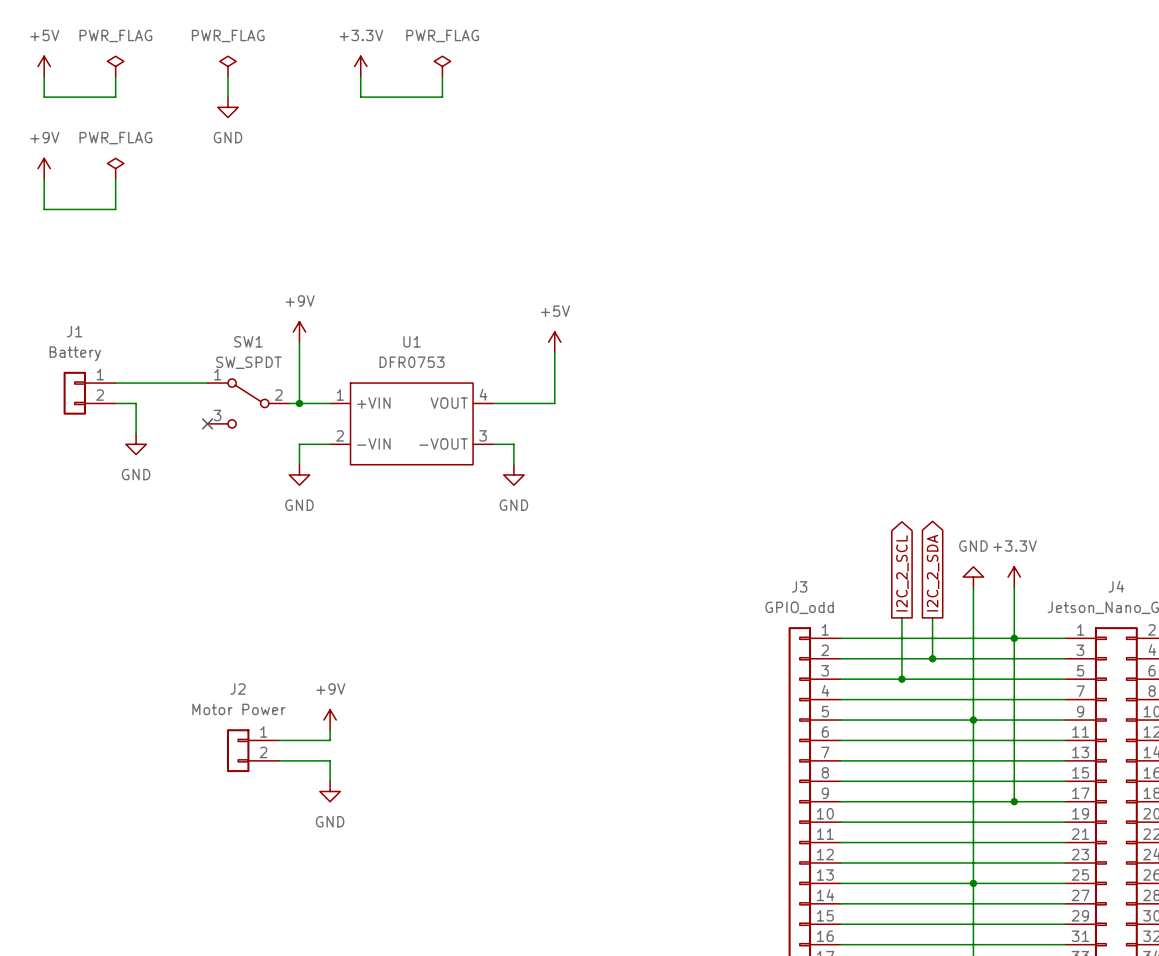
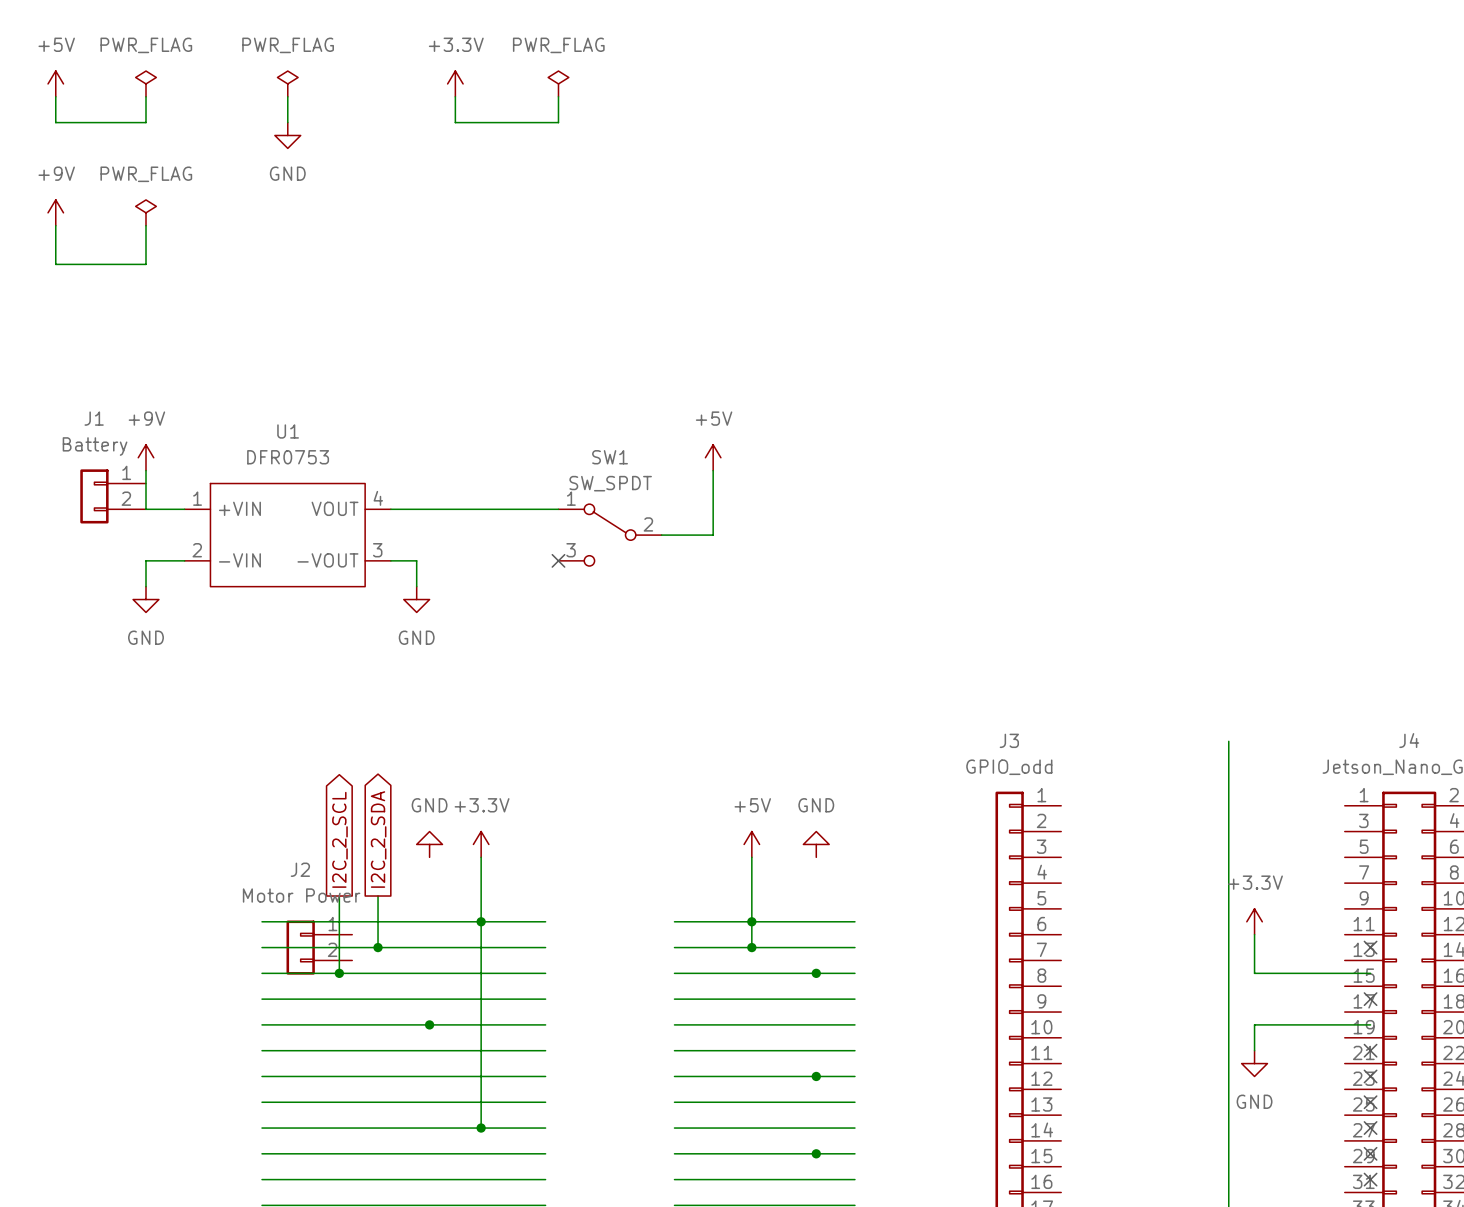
power symbol position: +9V (299, 331) -> +9V (146, 457)
wire: (299, 342) (299, 403) -> none
power symbol position: +5V (554, 342) -> +5V (713, 457)
wire: (554, 352) (554, 403) (493, 403) -> none
wire: none -> (146, 470) (146, 509)
wire: none -> (713, 470) (713, 535) (661, 535)
wire: (115, 383) (207, 383) -> none
wire: (136, 403) (136, 434) -> (171, 509) (184, 509)
SW1 position: (248, 403) -> (610, 535)
junction: (299, 403) -> none
wire: none -> (416, 509) (558, 509)
no-connect mark: (207, 423) -> none
U1 position: (411, 423) -> (287, 535)
power symbol position: GND (136, 444) -> GND (146, 599)
wire: none -> (184, 560) (146, 560) (146, 586)
wire: (309, 444) (299, 444) (299, 464) -> none
wire: none -> (416, 560) (416, 586)
no-connect mark: none -> (558, 560)
wire: (493, 444) (513, 444) (513, 464) -> none
power symbol position: GND (299, 474) -> GND (416, 599)
power symbol: GND (513, 474) -> none
global label: I2C_2_SCL (902, 573) -> none
global label: I2C_2_SDA (933, 573) -> none
power symbol: GND (973, 577) -> none
power symbol position: +3.3V (1014, 577) -> +3.3V (1254, 921)
wire: (1014, 587) (1014, 801) -> none
wire: (901, 617) (901, 679) -> none
wire: (932, 617) (932, 658) -> none
wire: (840, 638) (1065, 638) -> none
junction: (1014, 638) -> none
wire: (840, 658) (1065, 658) -> none
junction: (932, 658) -> none
global label: none -> I2C_2_SCL (339, 839)
global label: none -> I2C_2_SDA (378, 839)
power symbol: none -> GND (429, 844)
power symbol: none -> +3.3V (481, 844)
power symbol: none -> +5V (751, 844)
power symbol: none -> GND (816, 844)
wire: none -> (481, 857) (481, 1128)
wire: none -> (751, 857) (751, 947)
wire: (840, 679) (1065, 679) -> none
junction: (901, 679) -> none
wire: (840, 699) (1065, 699) -> none
wire: none -> (339, 896) (339, 973)
wire: none -> (378, 896) (378, 947)
power symbol: +9V (330, 720) -> none
wire: (840, 720) (1065, 720) -> none
junction: (973, 720) -> none
wire: none -> (262, 921) (545, 921)
wire: (330, 730) (330, 740) (279, 740) -> none
junction: none -> (481, 921)
wire: none -> (674, 921) (854, 921)
junction: none -> (751, 921)
wire: (840, 740) (1065, 740) -> none
wire: none -> (1254, 934) (1254, 973) (1370, 973)
wire: none -> (262, 947) (545, 947)
junction: none -> (378, 947)
wire: none -> (674, 947) (854, 947)
junction: none -> (751, 947)
no-connect mark: none -> (1370, 947)
wire: (279, 760) (330, 760) (330, 781) -> none
wire: (840, 760) (1065, 760) -> none
wire: none -> (262, 973) (545, 973)
junction: none -> (339, 973)
wire: none -> (674, 973) (854, 973)
junction: none -> (816, 973)
wire: (840, 781) (1065, 781) -> none
wire: none -> (262, 999) (545, 999)
power symbol: GND (330, 791) -> none
wire: none -> (674, 999) (854, 999)
no-connect mark: none -> (1370, 999)
wire: (840, 801) (1065, 801) -> none
junction: (1014, 801) -> none
wire: none -> (262, 1024) (545, 1024)
junction: none -> (429, 1024)
wire: none -> (674, 1024) (854, 1024)
wire: none -> (1370, 1024) (1254, 1024) (1254, 1050)
wire: (840, 822) (1065, 822) -> none
wire: none -> (262, 1050) (545, 1050)
wire: none -> (674, 1050) (854, 1050)
no-connect mark: none -> (1370, 1050)
wire: (840, 842) (1065, 842) -> none
power symbol: none -> GND (1254, 1063)
wire: none -> (262, 1076) (545, 1076)
wire: none -> (674, 1076) (854, 1076)
junction: none -> (816, 1076)
no-connect mark: none -> (1370, 1076)
wire: (840, 862) (1065, 862) -> none
wire: none -> (262, 1102) (545, 1102)
wire: none -> (674, 1102) (854, 1102)
no-connect mark: none -> (1370, 1102)
wire: (840, 883) (1065, 883) -> none
junction: (973, 883) -> none
wire: none -> (262, 1128) (545, 1128)
junction: none -> (481, 1128)
wire: none -> (674, 1128) (854, 1128)
no-connect mark: none -> (1370, 1128)
wire: (840, 903) (1065, 903) -> none
wire: none -> (262, 1153) (545, 1153)
wire: none -> (674, 1153) (854, 1153)
junction: none -> (816, 1153)
no-connect mark: none -> (1370, 1153)
wire: (840, 924) (1065, 924) -> none
wire: none -> (262, 1179) (545, 1179)
wire: none -> (674, 1179) (854, 1179)
no-connect mark: none -> (1370, 1179)
wire: (840, 944) (1065, 944) -> none
wire: none -> (262, 1205) (545, 1205)
wire: none -> (674, 1205) (854, 1205)

